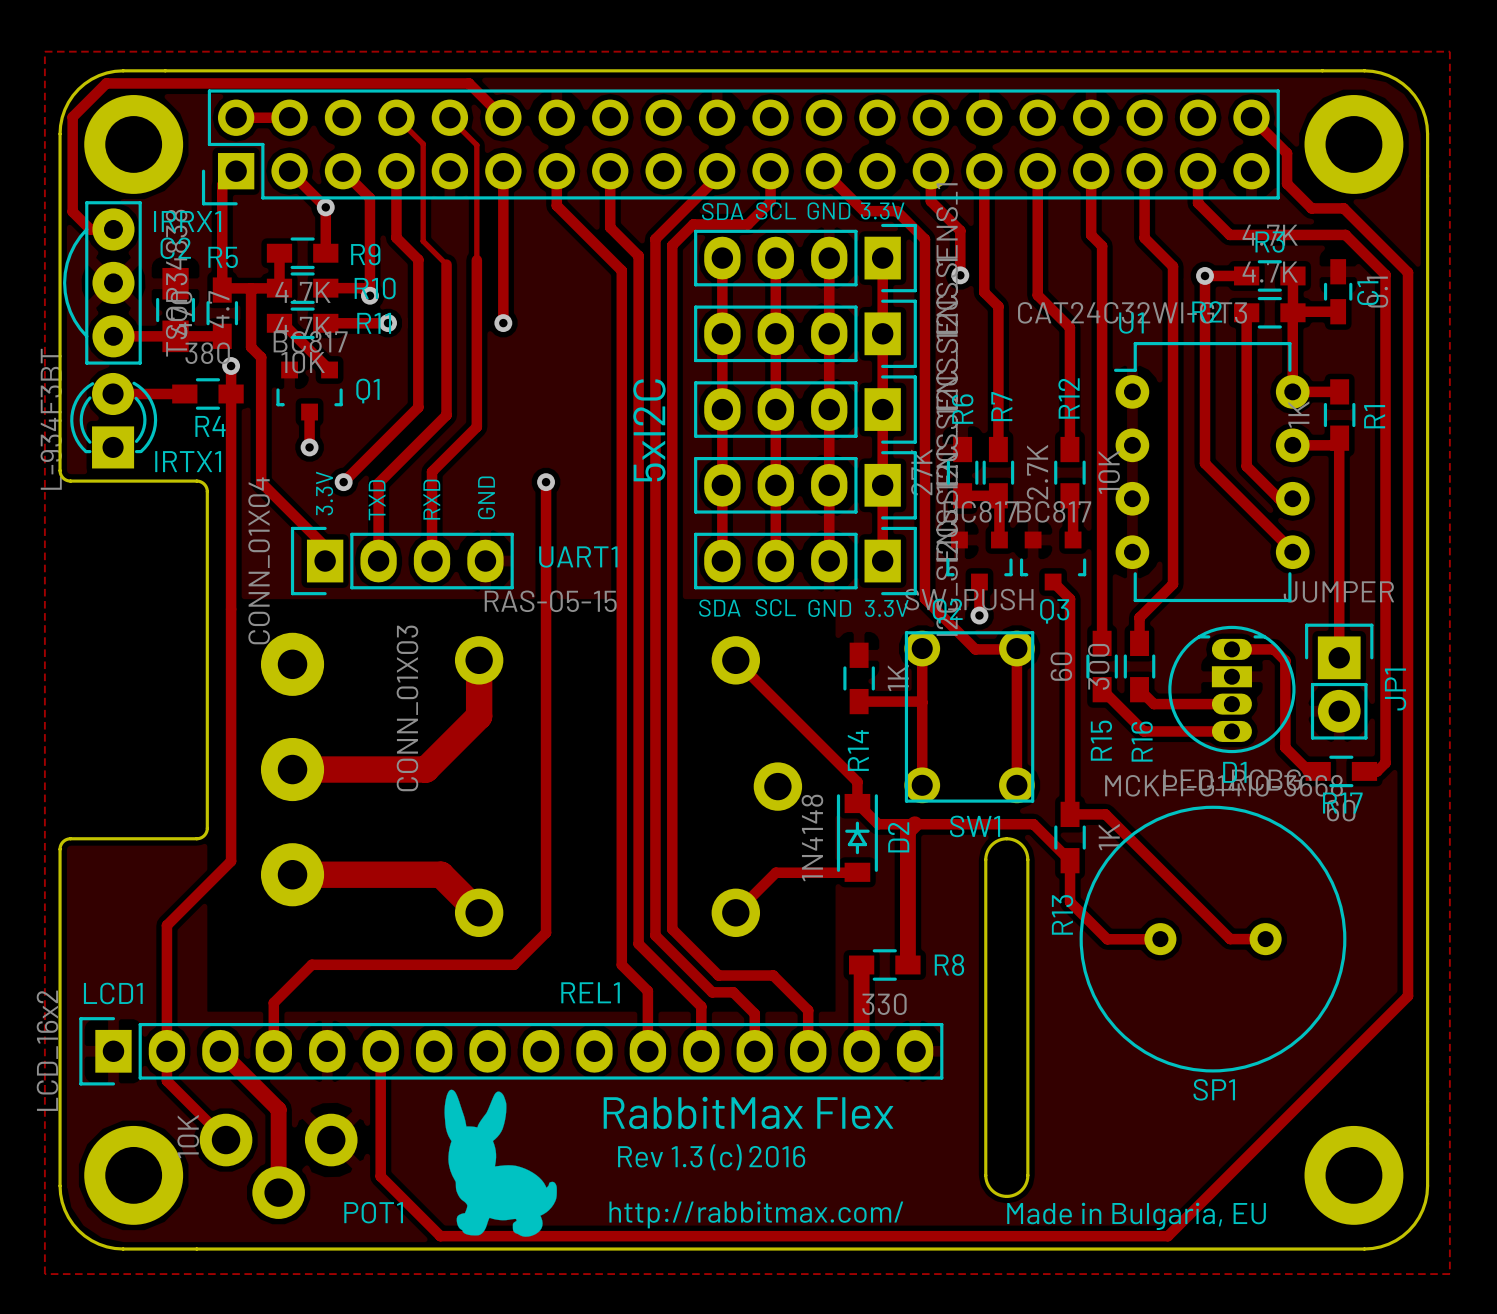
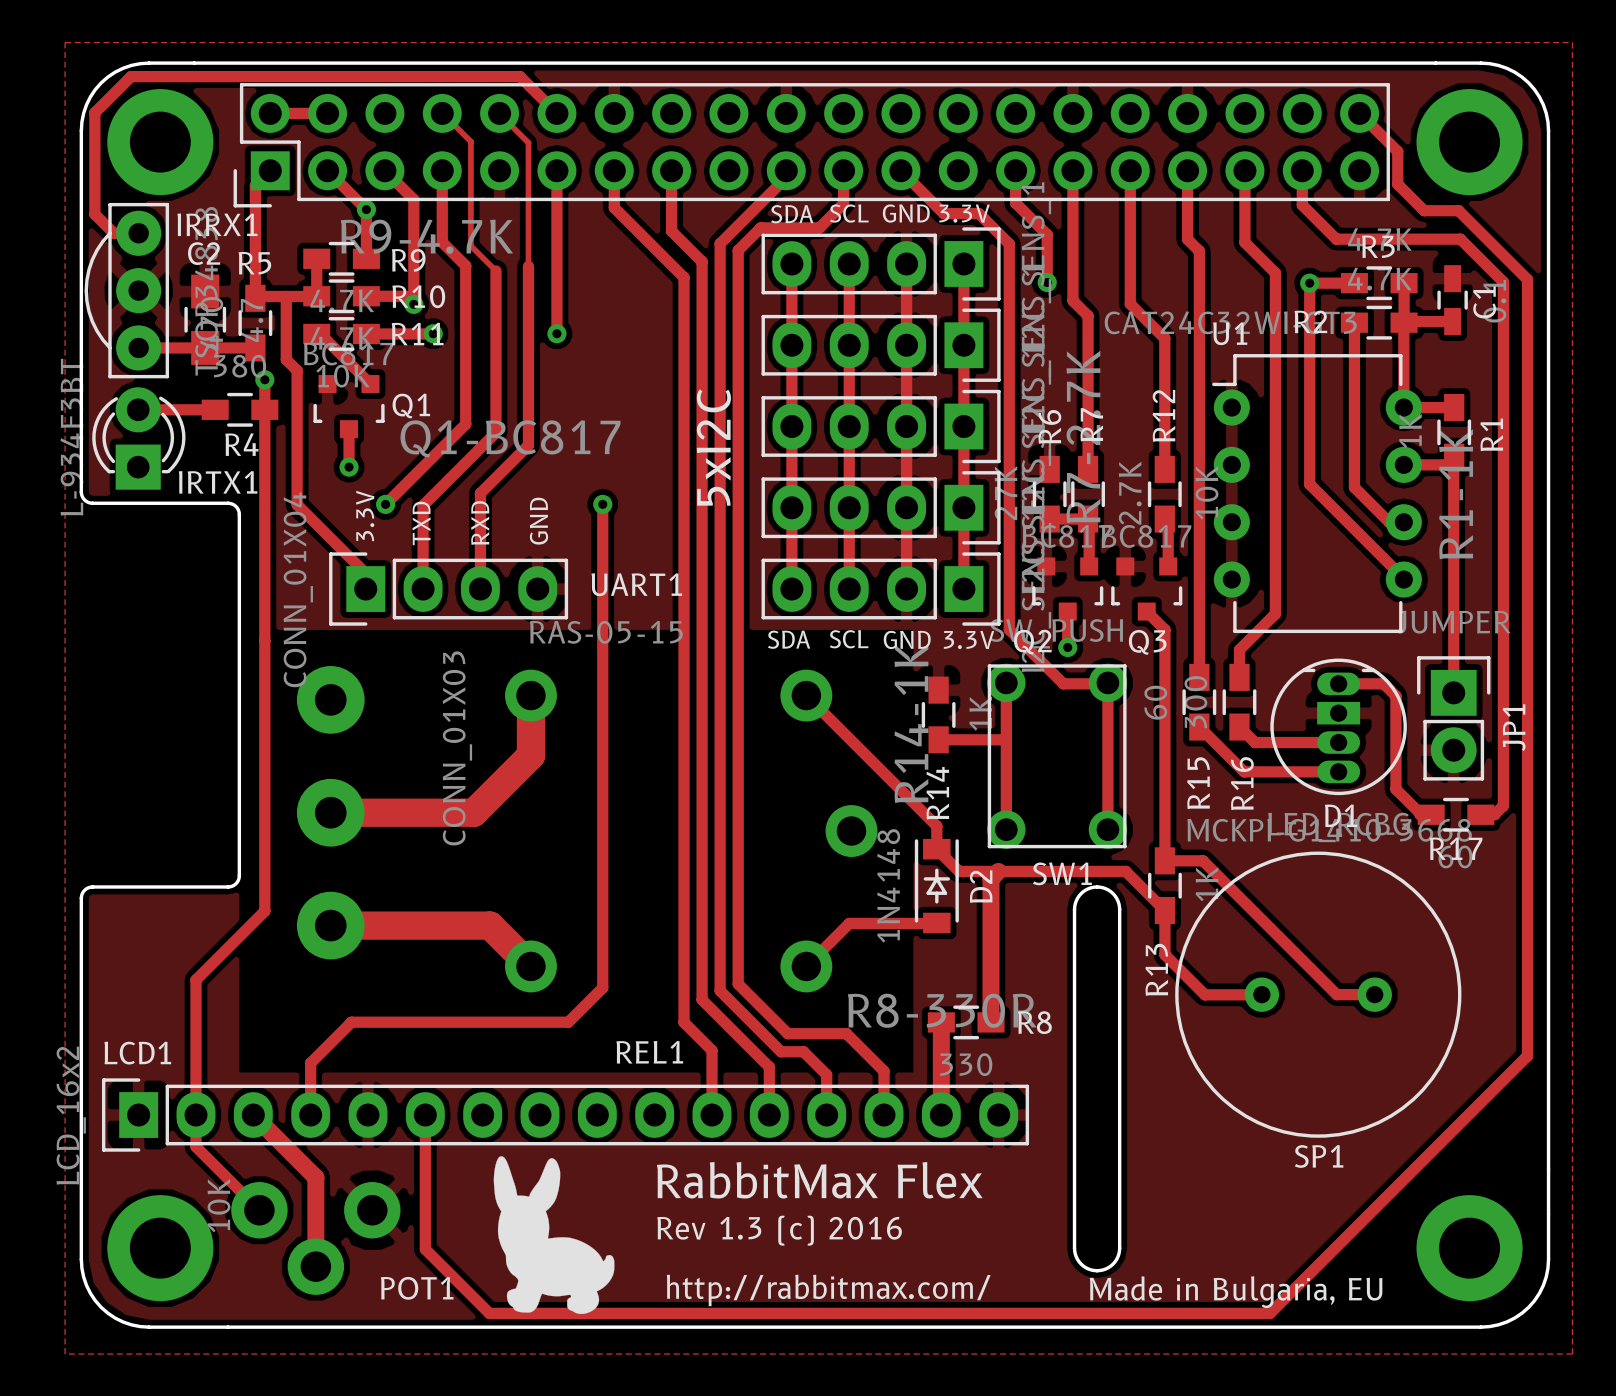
text: none -> R9-4.7K (426, 236)
text: none -> R7-2.7K (1083, 436)
text: none -> Q1-BC817 (510, 438)
text: none -> R1-1K (1456, 494)
text: none -> R14-1K (911, 723)
text: none -> R8-330R (942, 1010)

